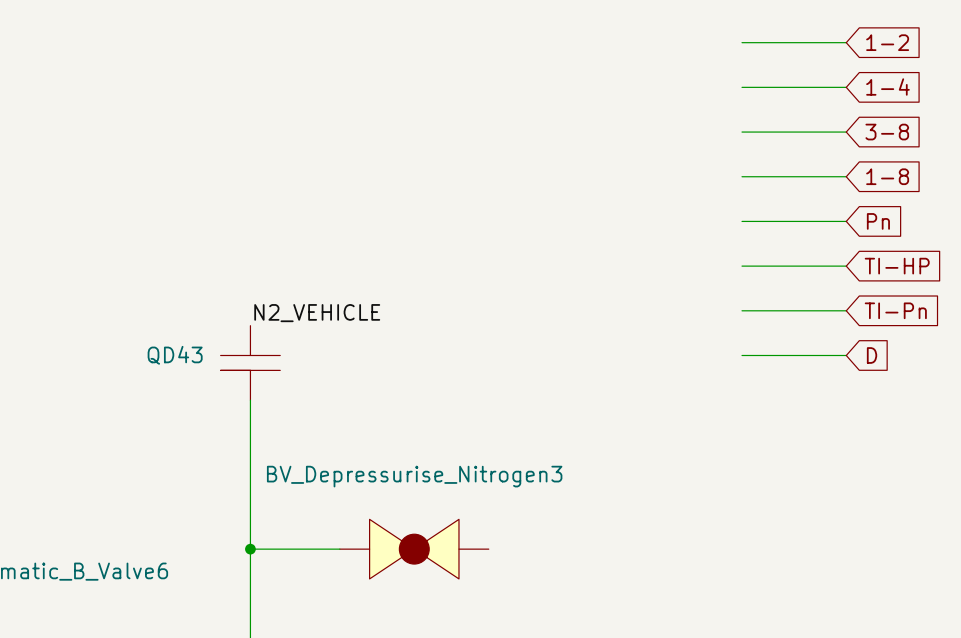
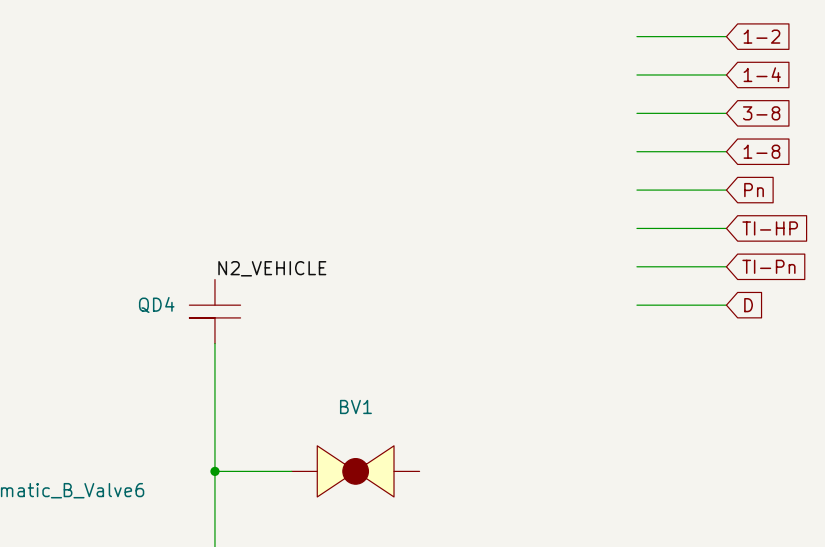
QD43 name: QD43 (175, 355) -> QD4 (156, 304)
BV_Depressurise_Nitrogen3 name: BV_Depressurise_Nitrogen3 (414, 476) -> BV1 (355, 406)

